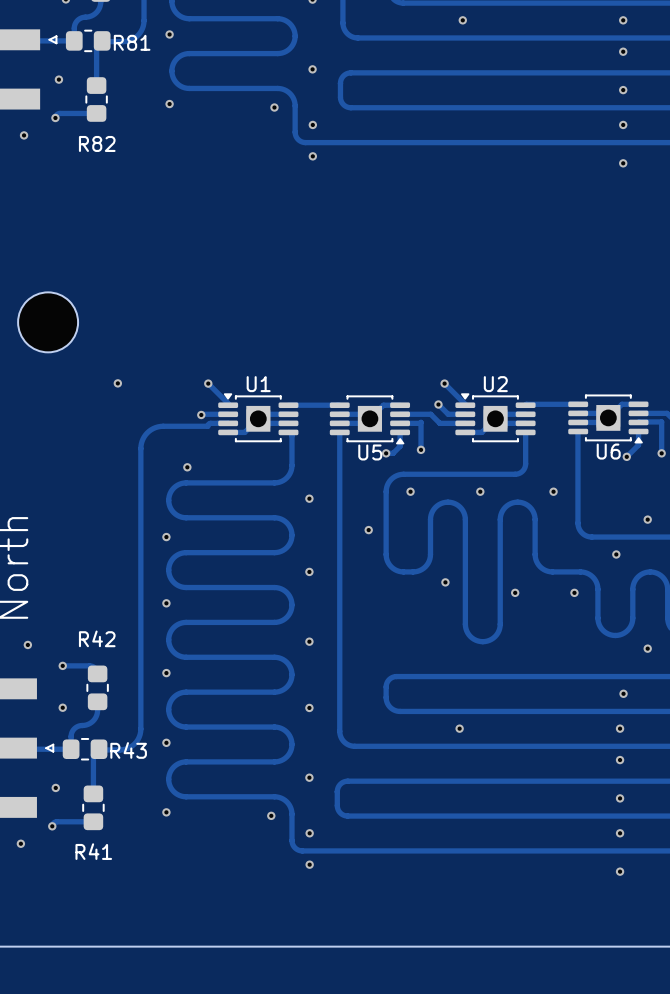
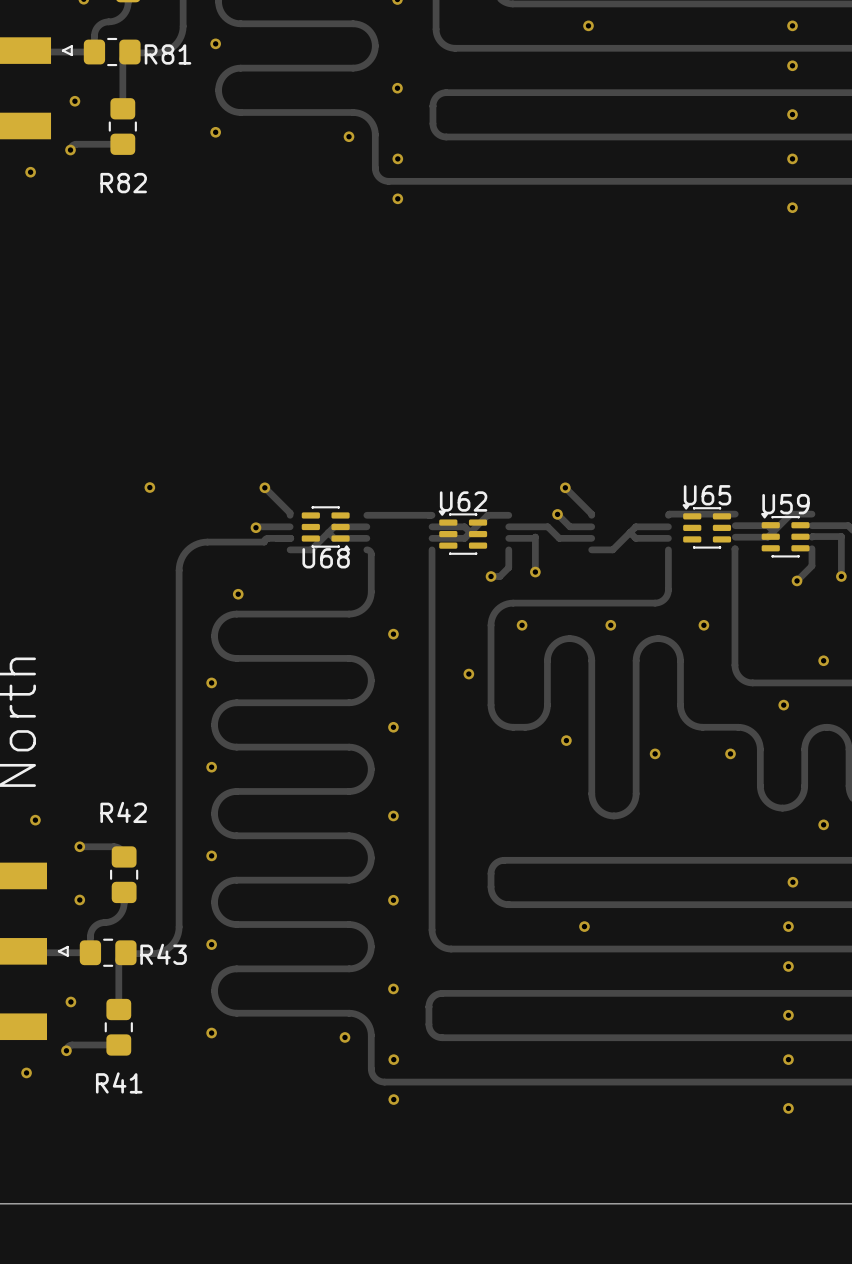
part: (48, 322) -> none
U65: none -> (706, 526)
U68: none -> (325, 528)
U1: (258, 417) -> none
U2: (495, 417) -> none
U62: none -> (462, 532)
U5: (369, 419) -> none
U6: (608, 419) -> none
U59: none -> (785, 535)

